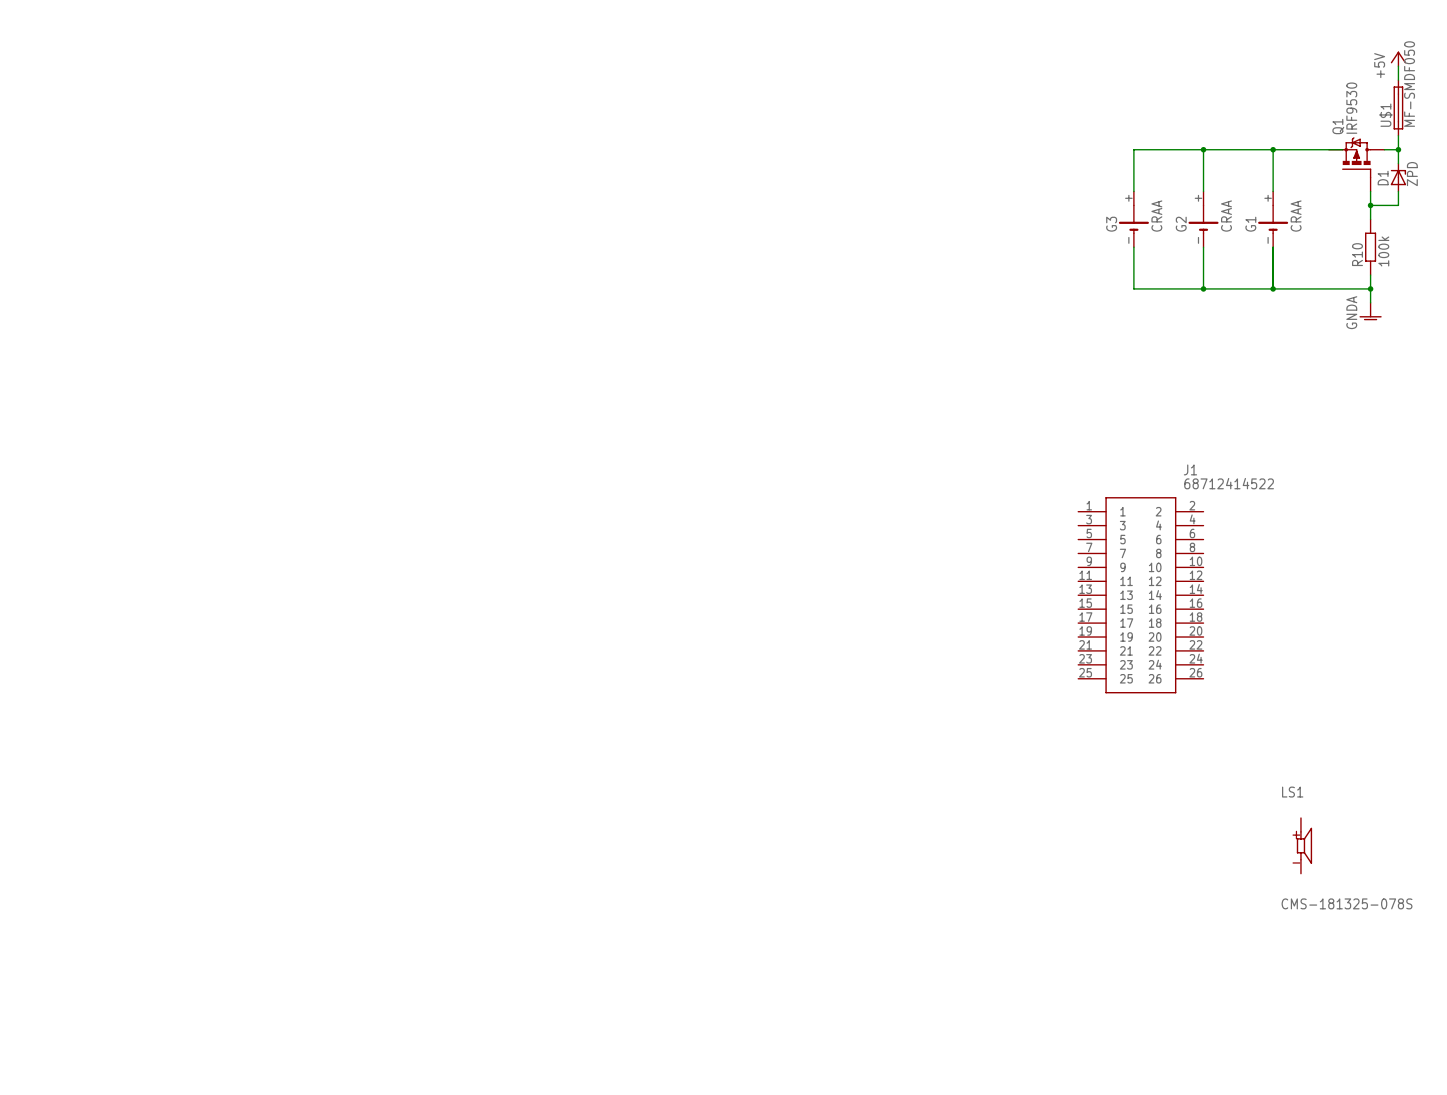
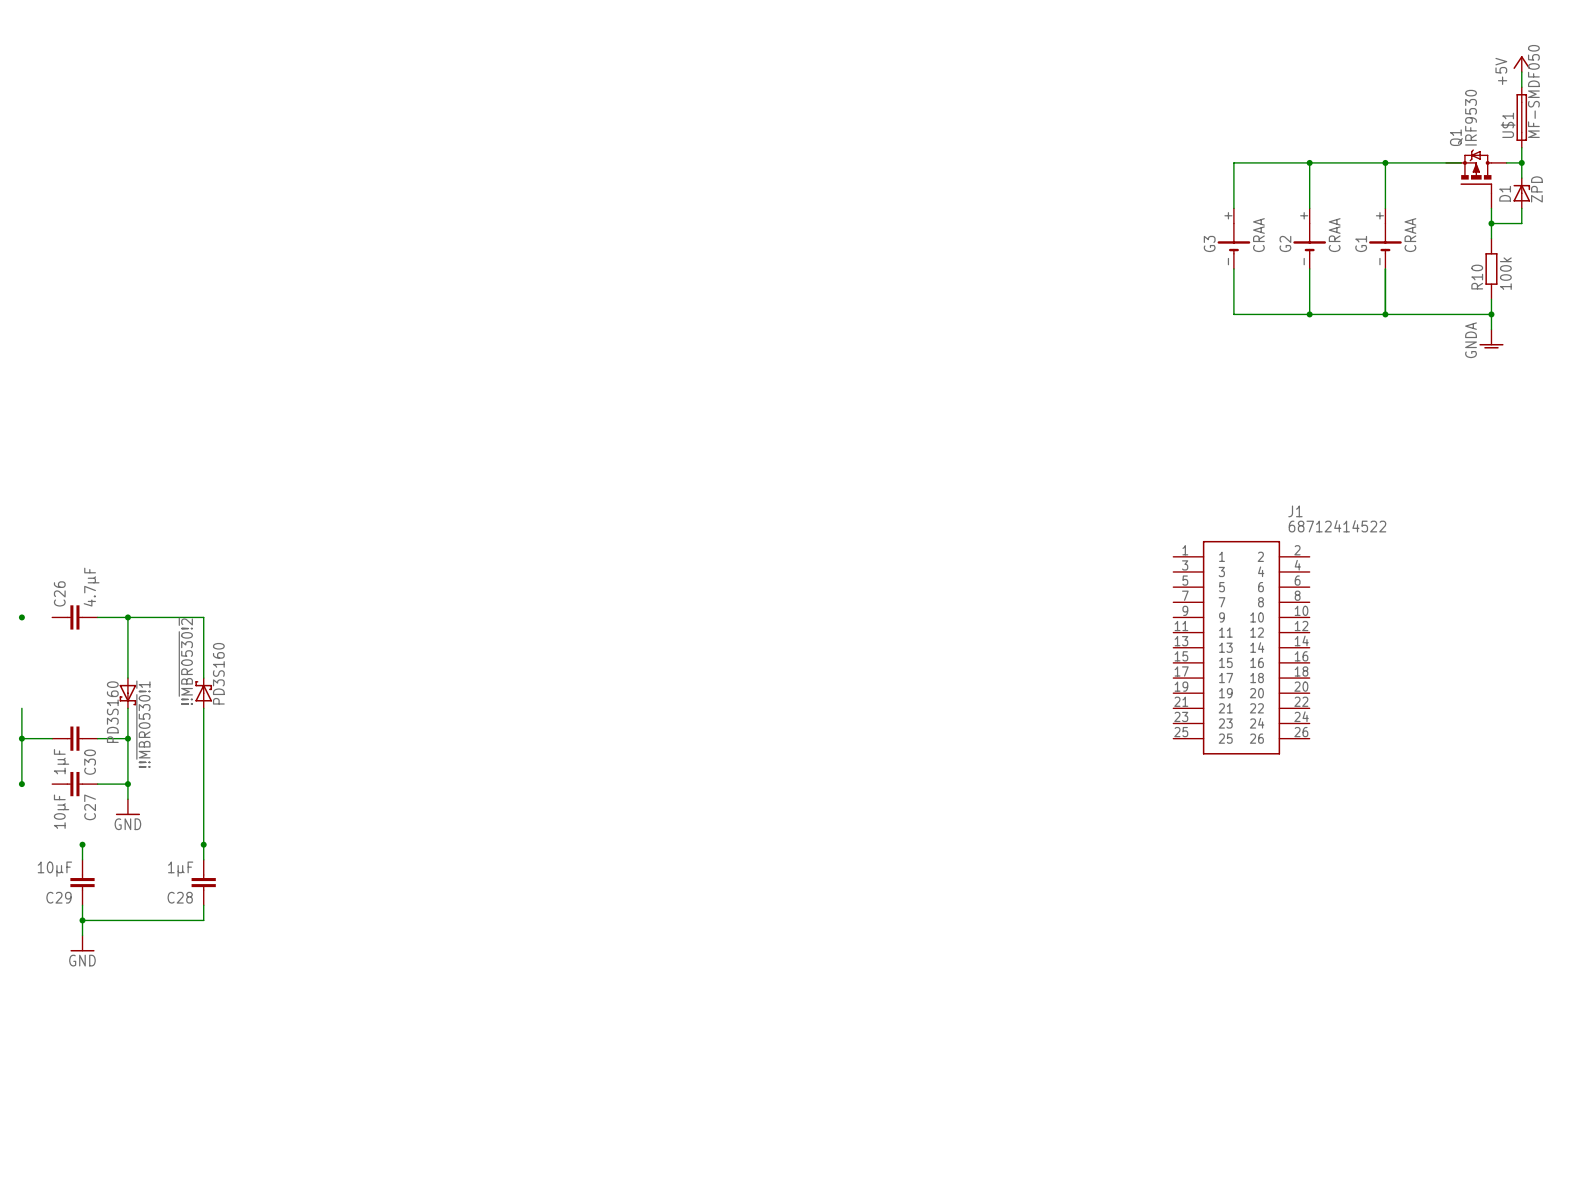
junction: none -> (21, 617)
C26: none -> 4.7µF (74, 617)
wire: none -> (97, 617) (203, 617) (203, 678)
wire: none -> (127, 617) (127, 678)
junction: none -> (127, 617)
!!~{MBR0530}!~{1}: none -> PD3S160 (127, 693)
!!~{MBR0530}!~{2}: none -> PD3S160 (203, 693)
wire: none -> (21, 708) (21, 784)
wire: none -> (127, 708) (127, 799)
wire: none -> (203, 708) (203, 859)
wire: none -> (21, 738) (52, 738)
junction: none -> (21, 738)
C30: none -> 1µF (74, 738)
wire: none -> (97, 738) (127, 738)
junction: none -> (127, 738)
junction: none -> (21, 784)
C27: none -> 10µF (74, 784)
wire: none -> (97, 784) (127, 784)
junction: none -> (127, 784)
power symbol: none -> GND (127, 807)
wire: none -> (82, 844) (82, 859)
junction: none -> (82, 844)
junction: none -> (203, 844)
C29: none -> 10µF (82, 882)
C28: none -> 1µF (203, 882)
wire: none -> (82, 905) (82, 935)
wire: none -> (203, 905) (203, 920) (82, 920)
junction: none -> (82, 920)
LS1: CMS-181325-078S (1304, 845) -> none
power symbol: none -> GND (82, 943)

